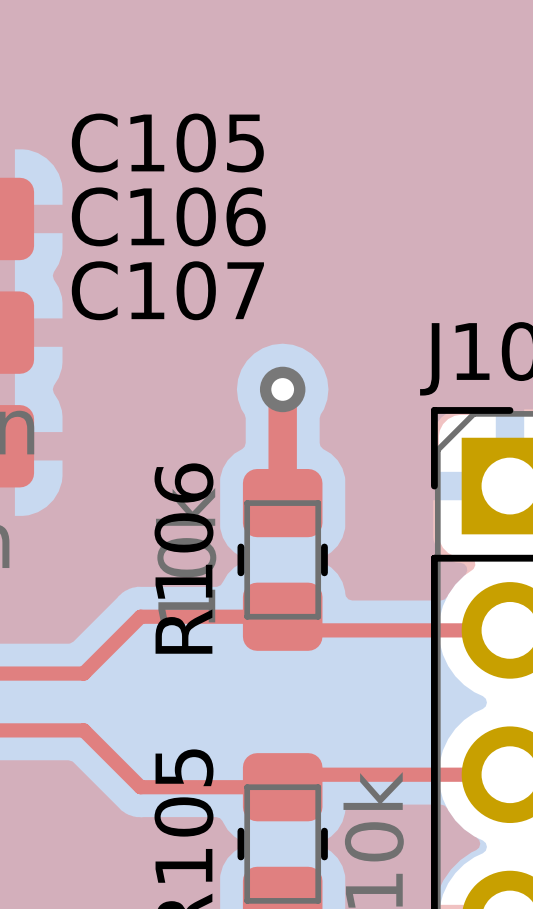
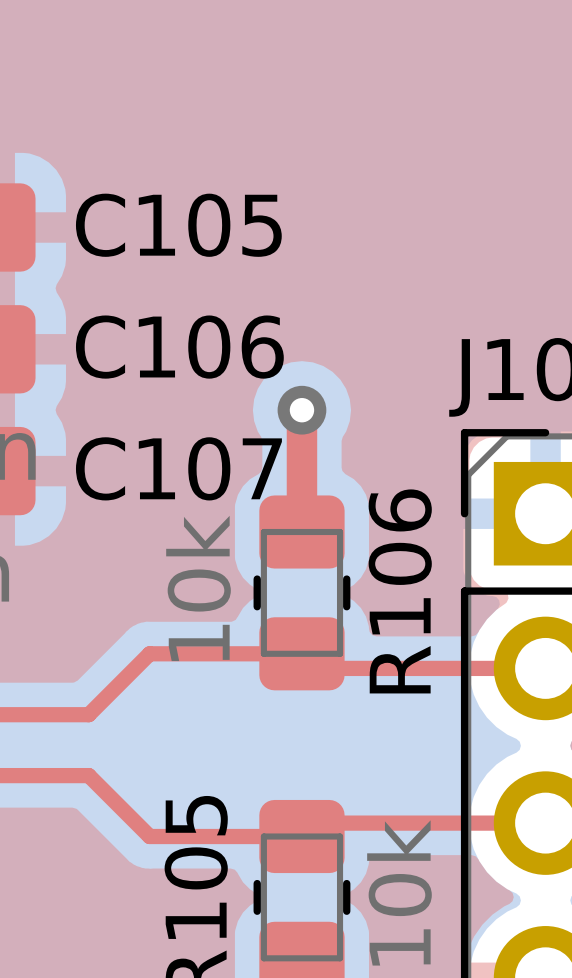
C105 name position: C105 (167, 143) -> C105 (178, 225)
C106 name position: C106 (168, 216) -> C106 (179, 347)
C107 name position: C107 (167, 290) -> C107 (178, 468)
R106 name position: R106 (184, 558) -> R106 (400, 591)

